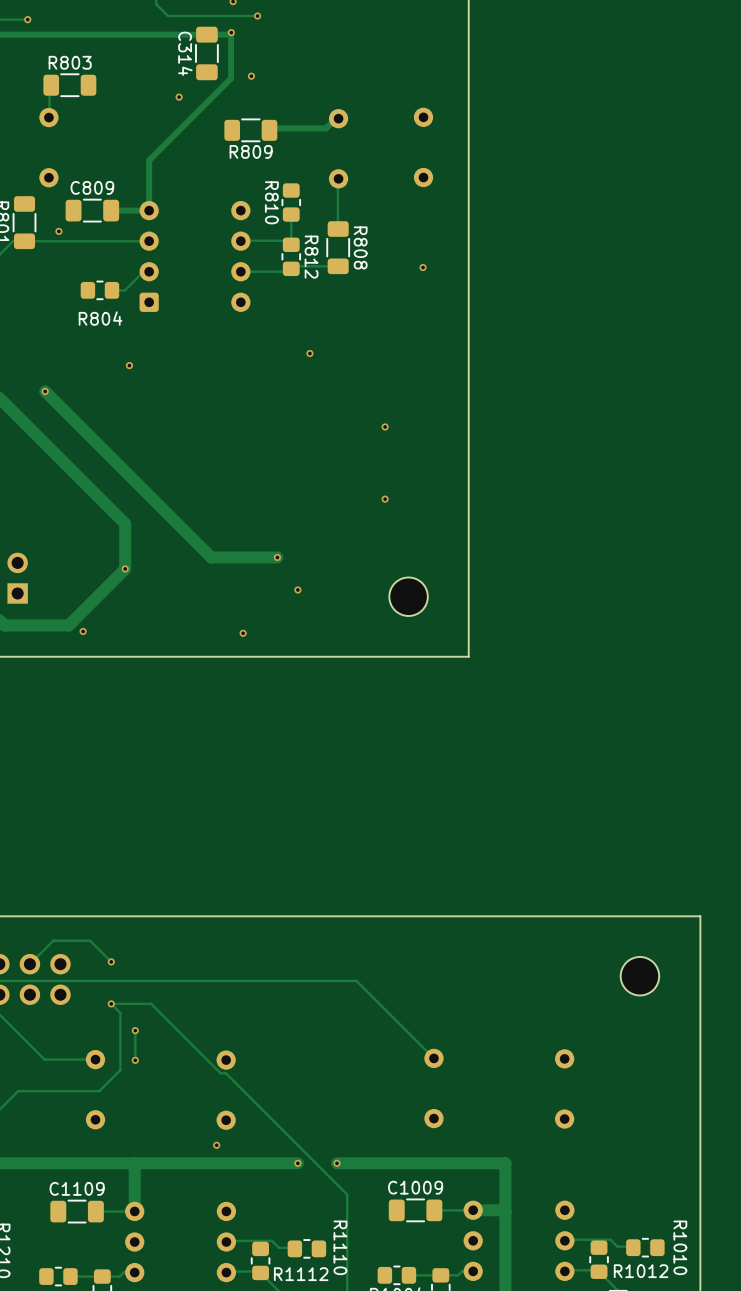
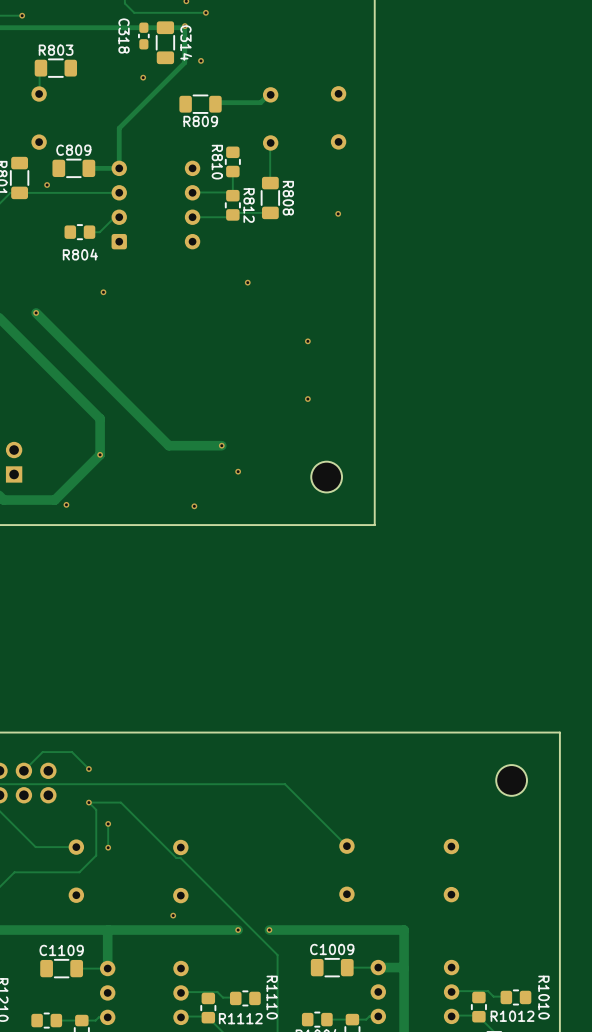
C318: none -> (143, 36)
C314 name position: C314 (185, 53) -> C314 (186, 42)

